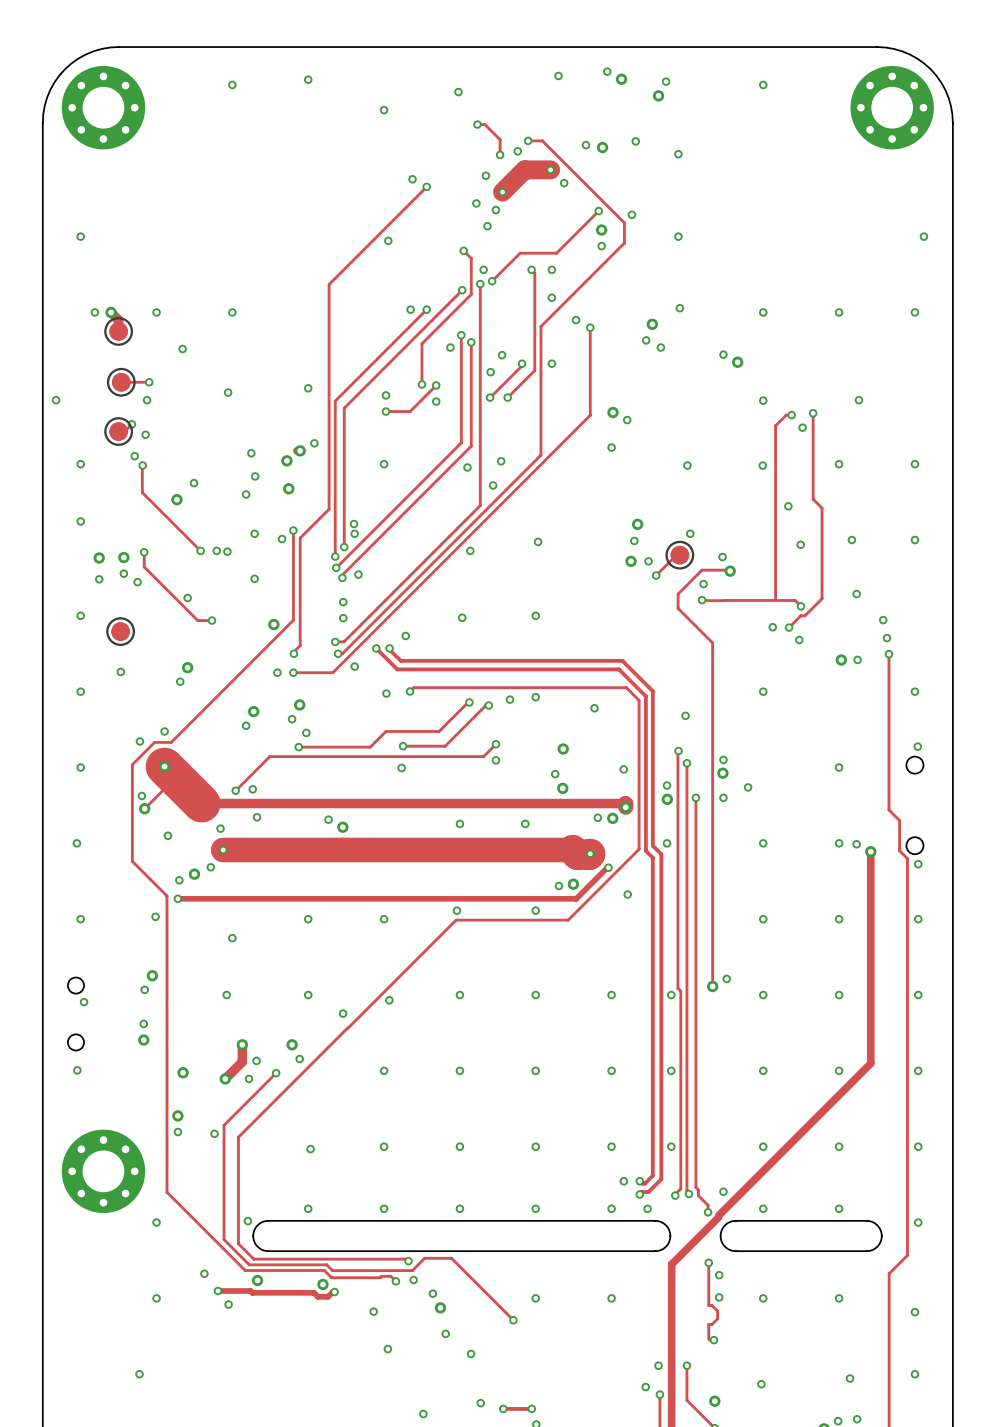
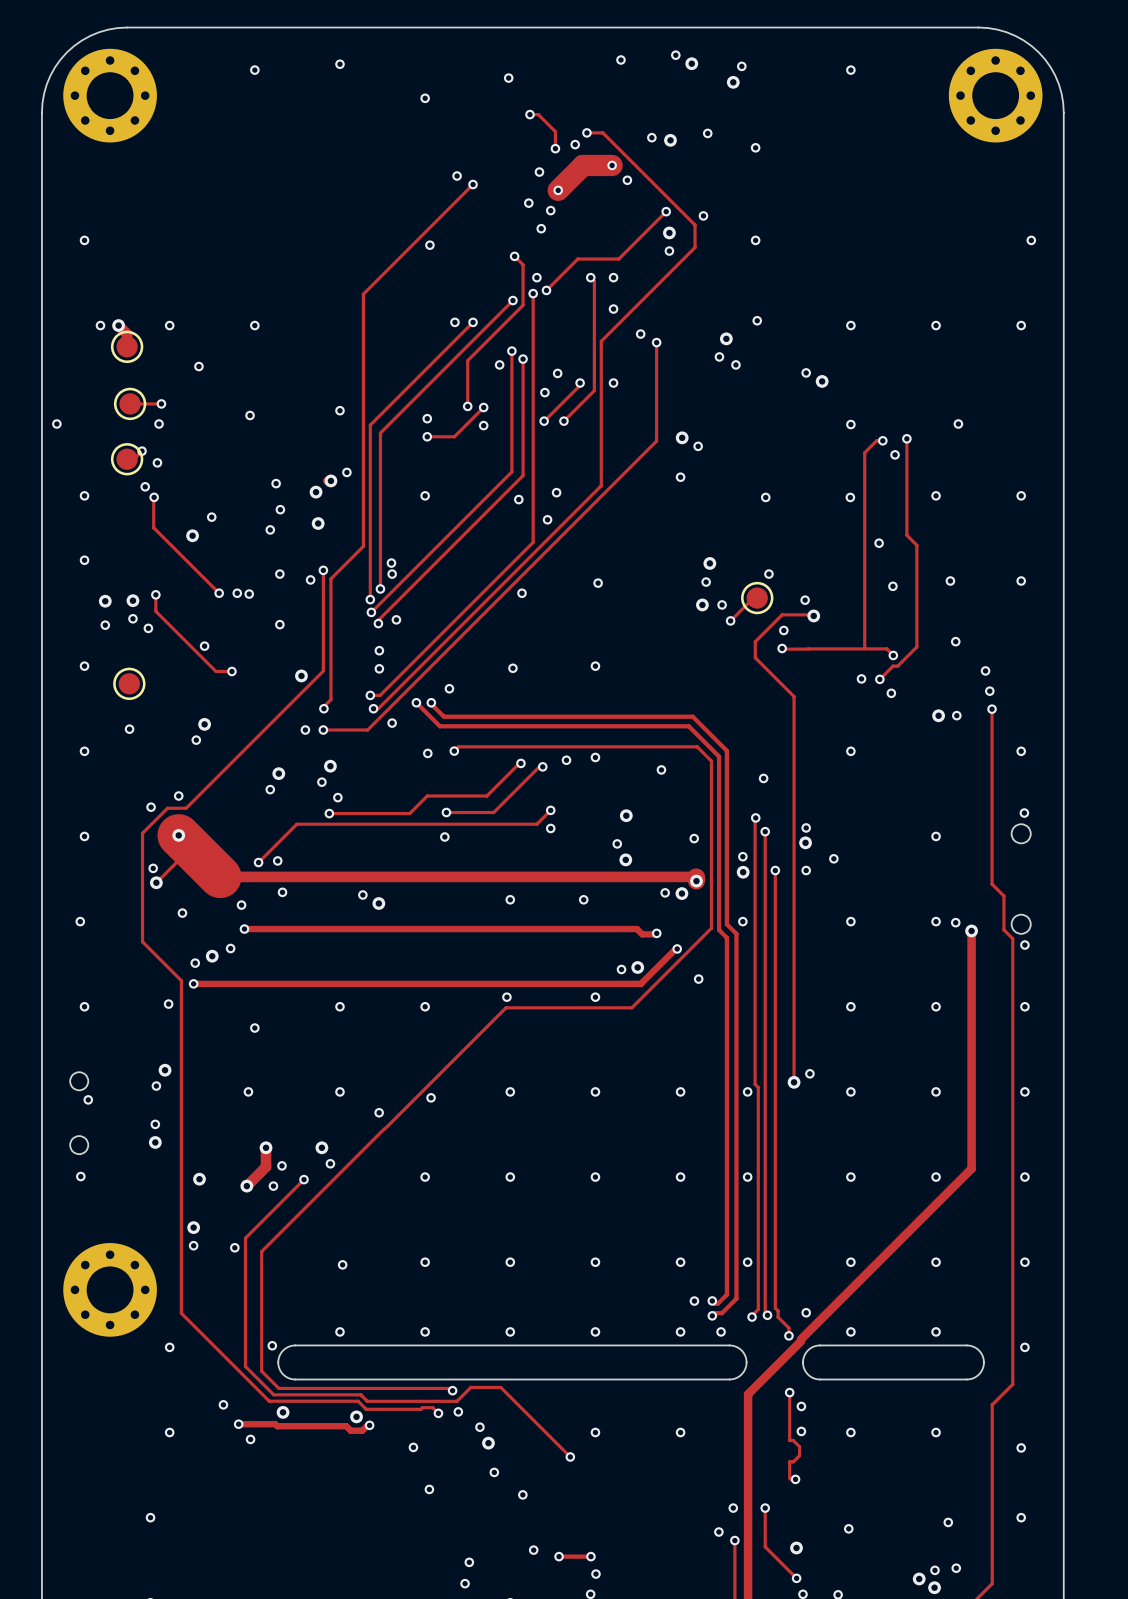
track width: thick (223, 849) (572, 849) (577, 854) (590, 853) -> thin (244, 929) (636, 929) (642, 934) (656, 933)

